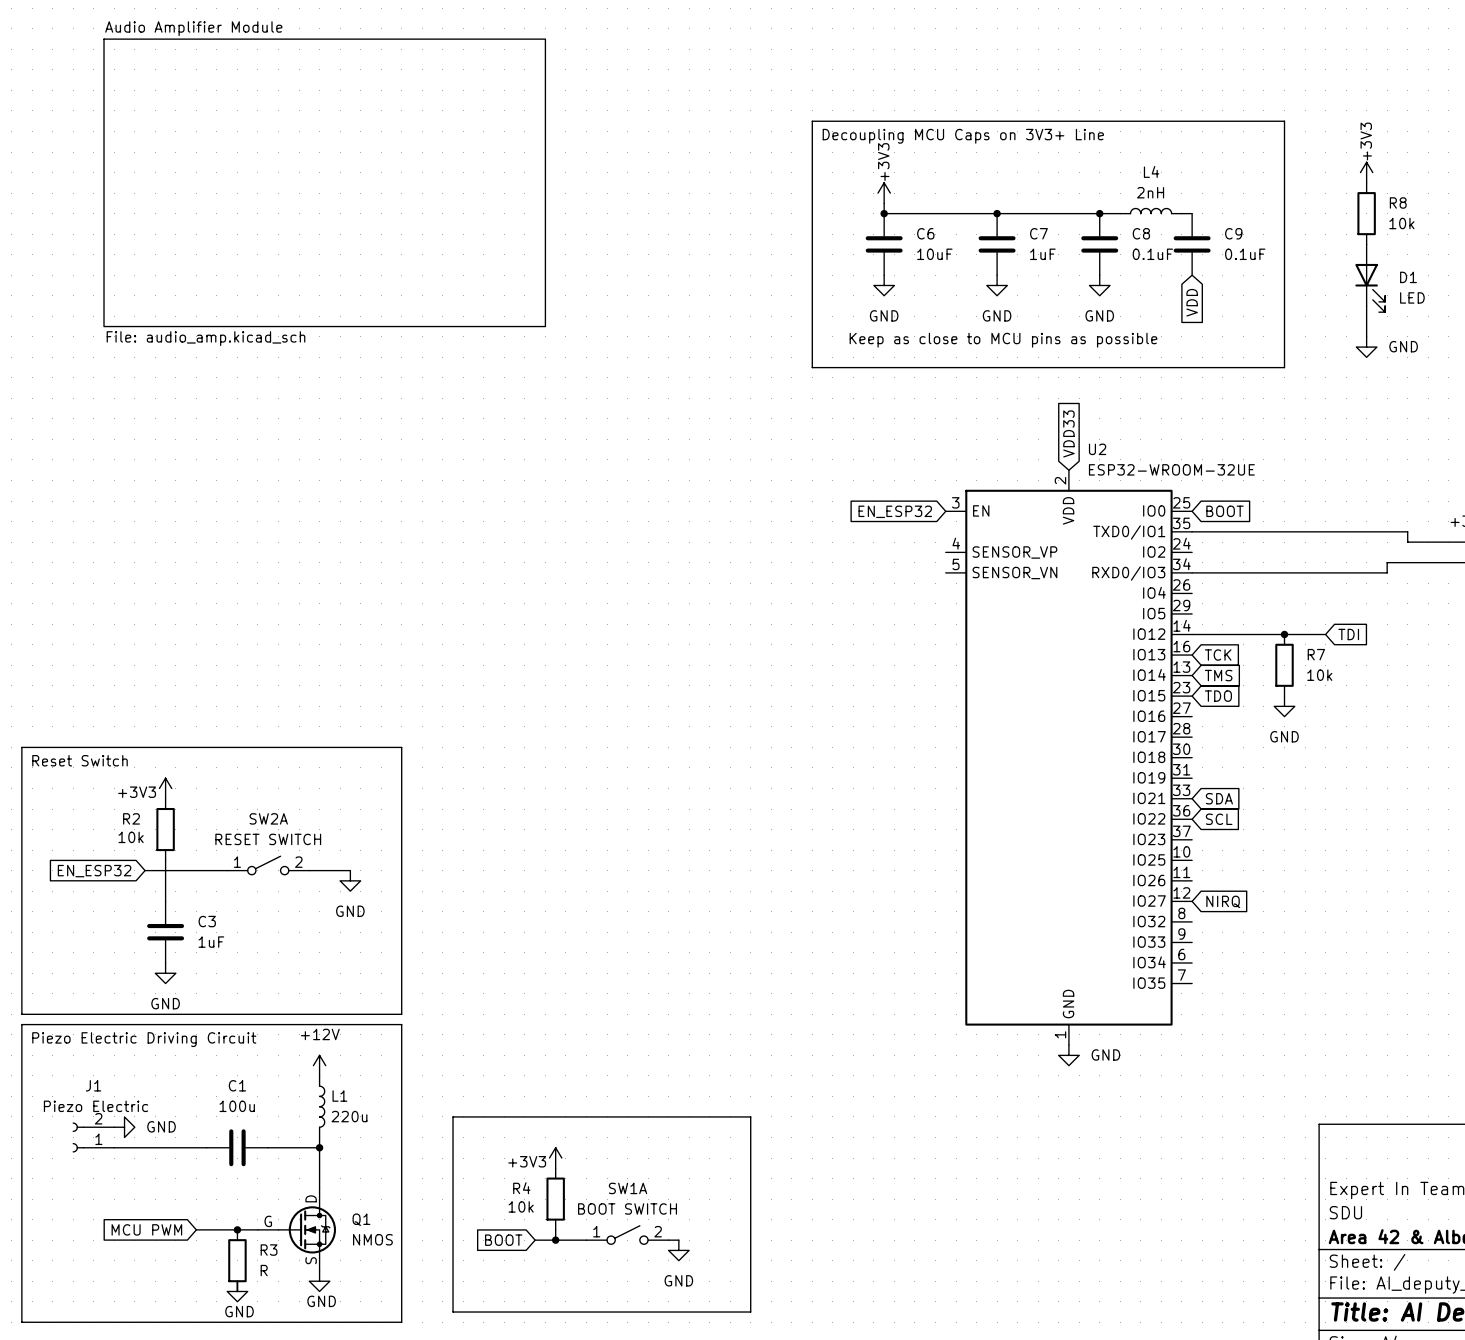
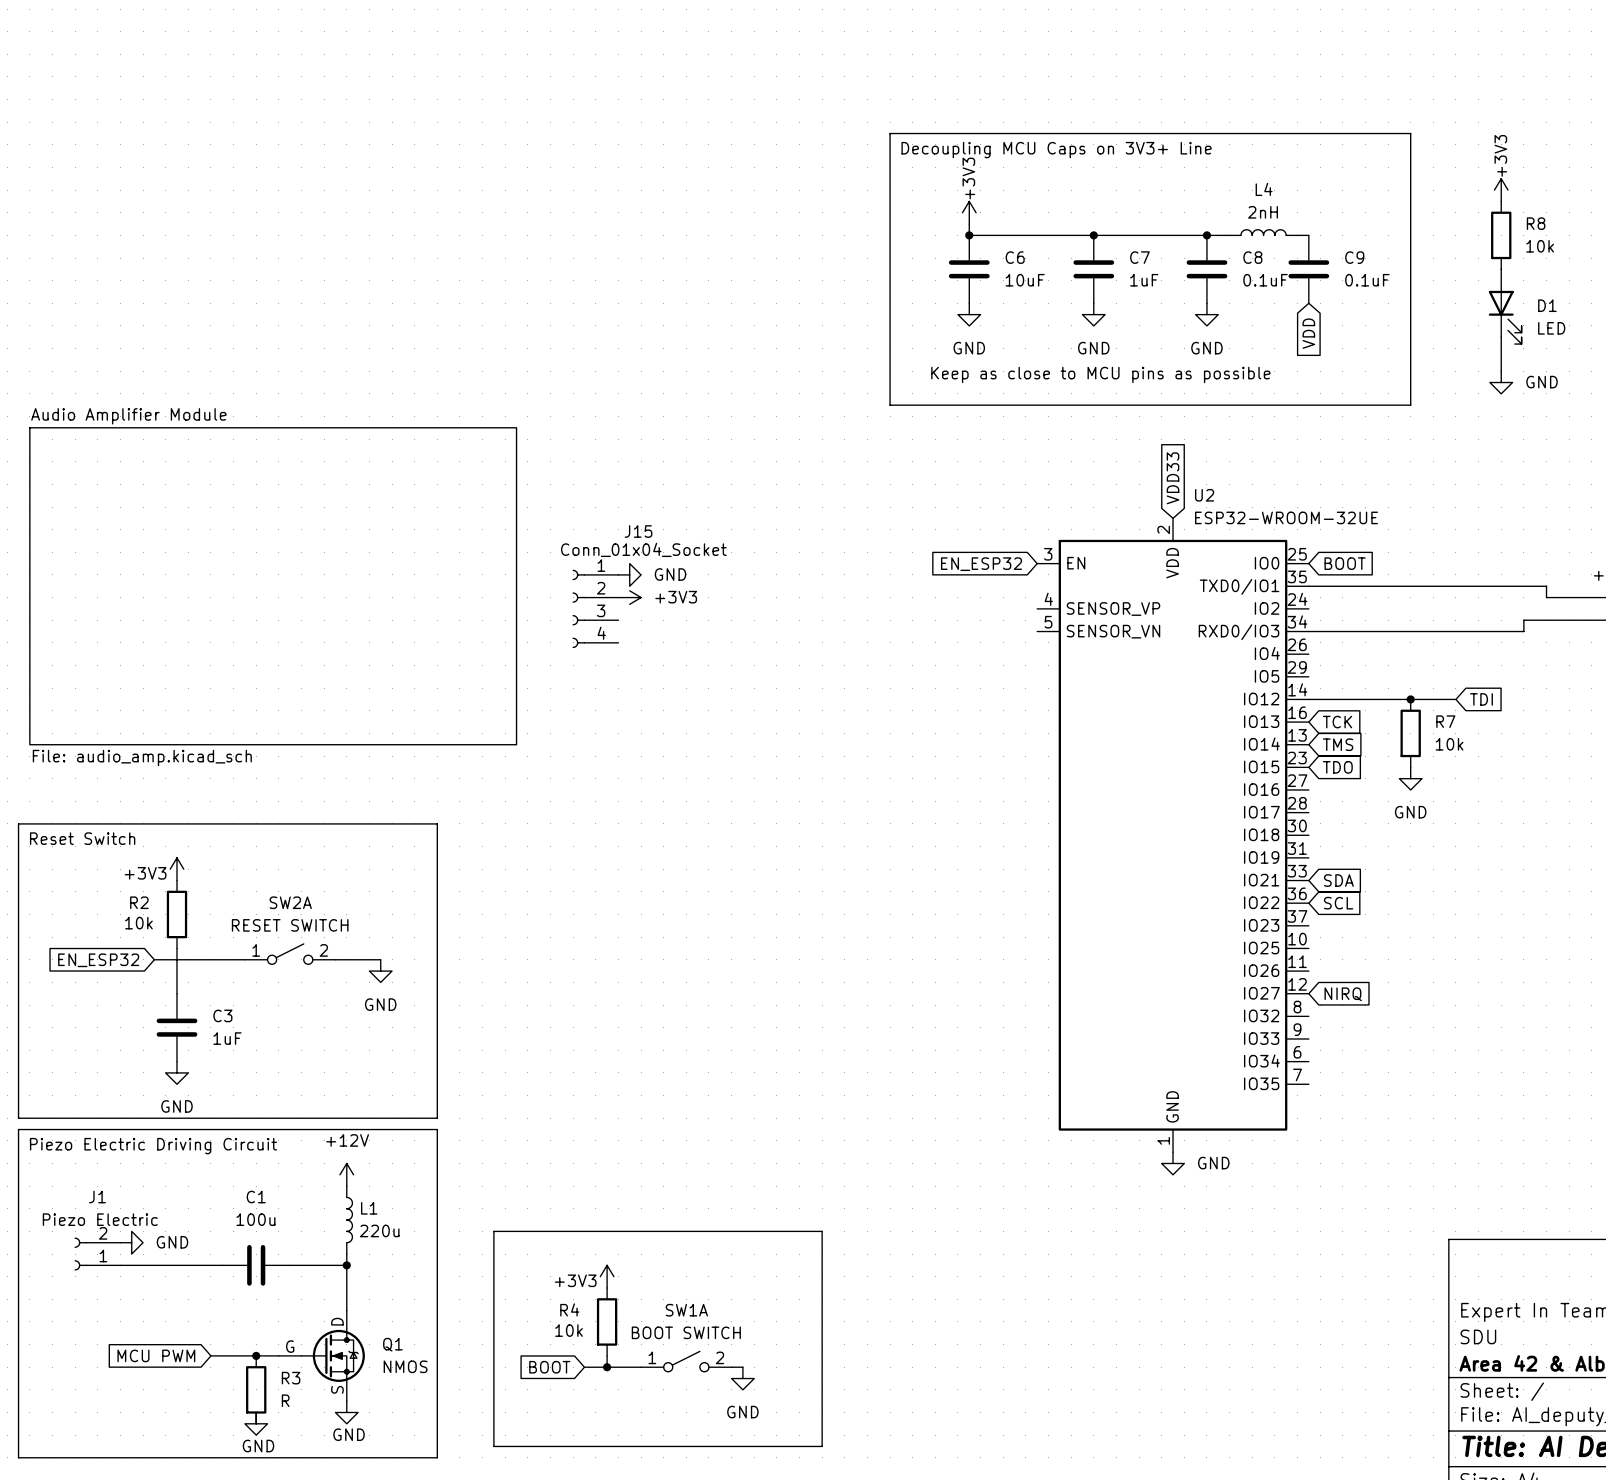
sheet Audio Amplifier Module: File: audio_amp.kicad_sch (324, 182) -> none
power symbol: none -> GND (629, 574)
sheet Audio Amplifier Module: none -> File: audio_amp.kicad_sch (273, 586)
power symbol: none -> +3V3 (629, 597)
J15: none -> Conn_01x04_Socket (595, 608)

